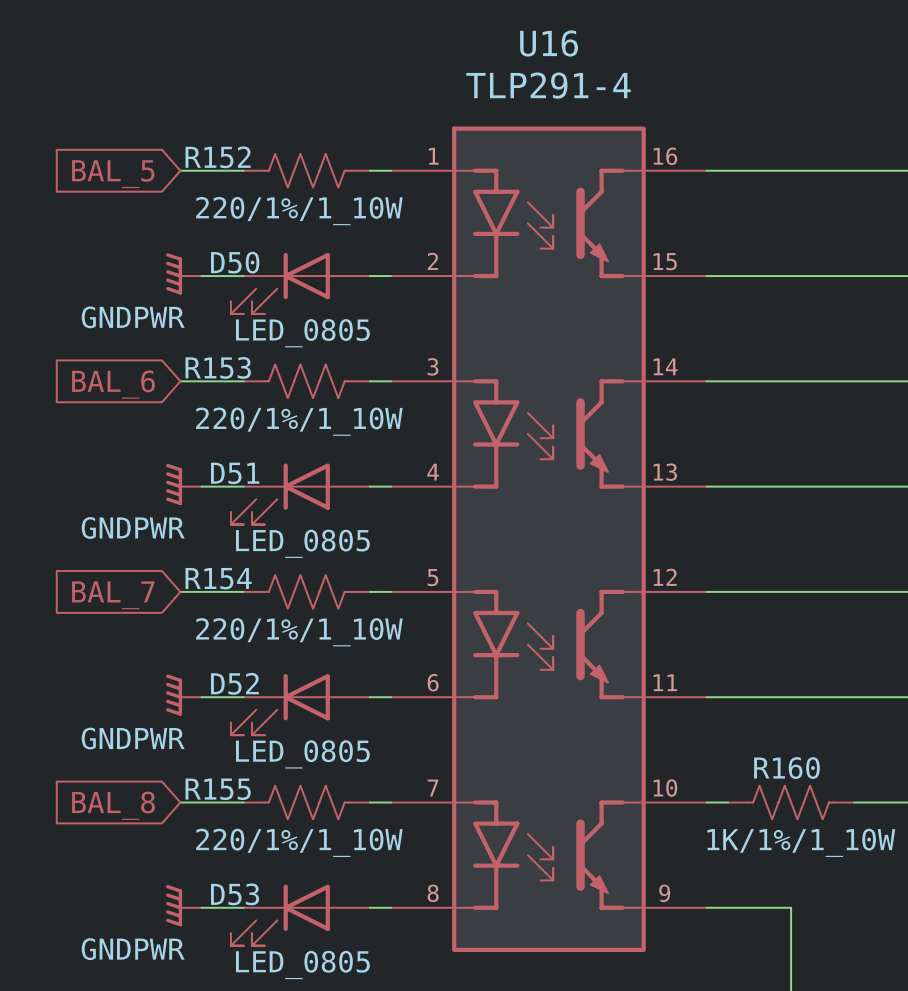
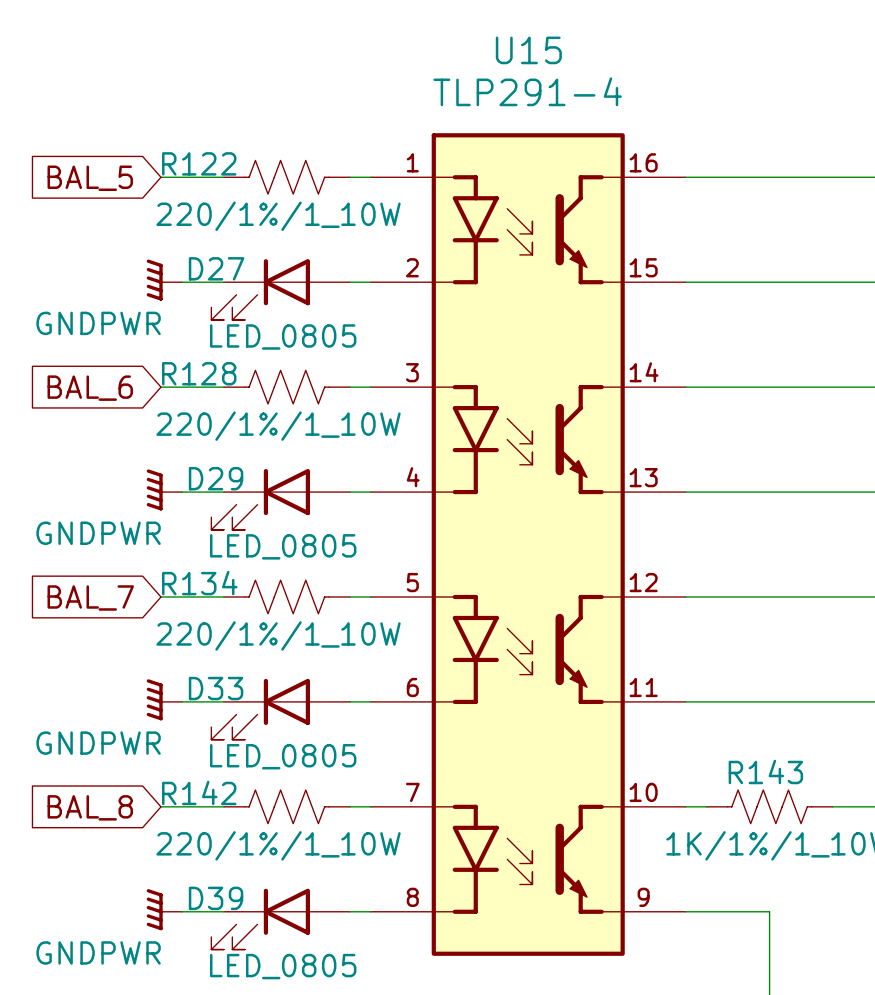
U16 name: U16 (549, 43) -> U15 (528, 50)
R152 name: R152 (218, 157) -> R122 (199, 163)
D50 name: D50 (235, 262) -> D27 (216, 268)
R153 name: R153 (218, 367) -> R128 (199, 373)
D51 name: D51 (235, 473) -> D29 (216, 478)
R154 name: R154 (218, 578) -> R134 (199, 583)
D52 name: D52 (234, 683) -> D33 (216, 688)
R160 name: R160 (786, 768) -> R143 (765, 771)
R155 name: R155 (218, 789) -> R142 (199, 792)
D53 name: D53 (235, 894) -> D39 (216, 898)

